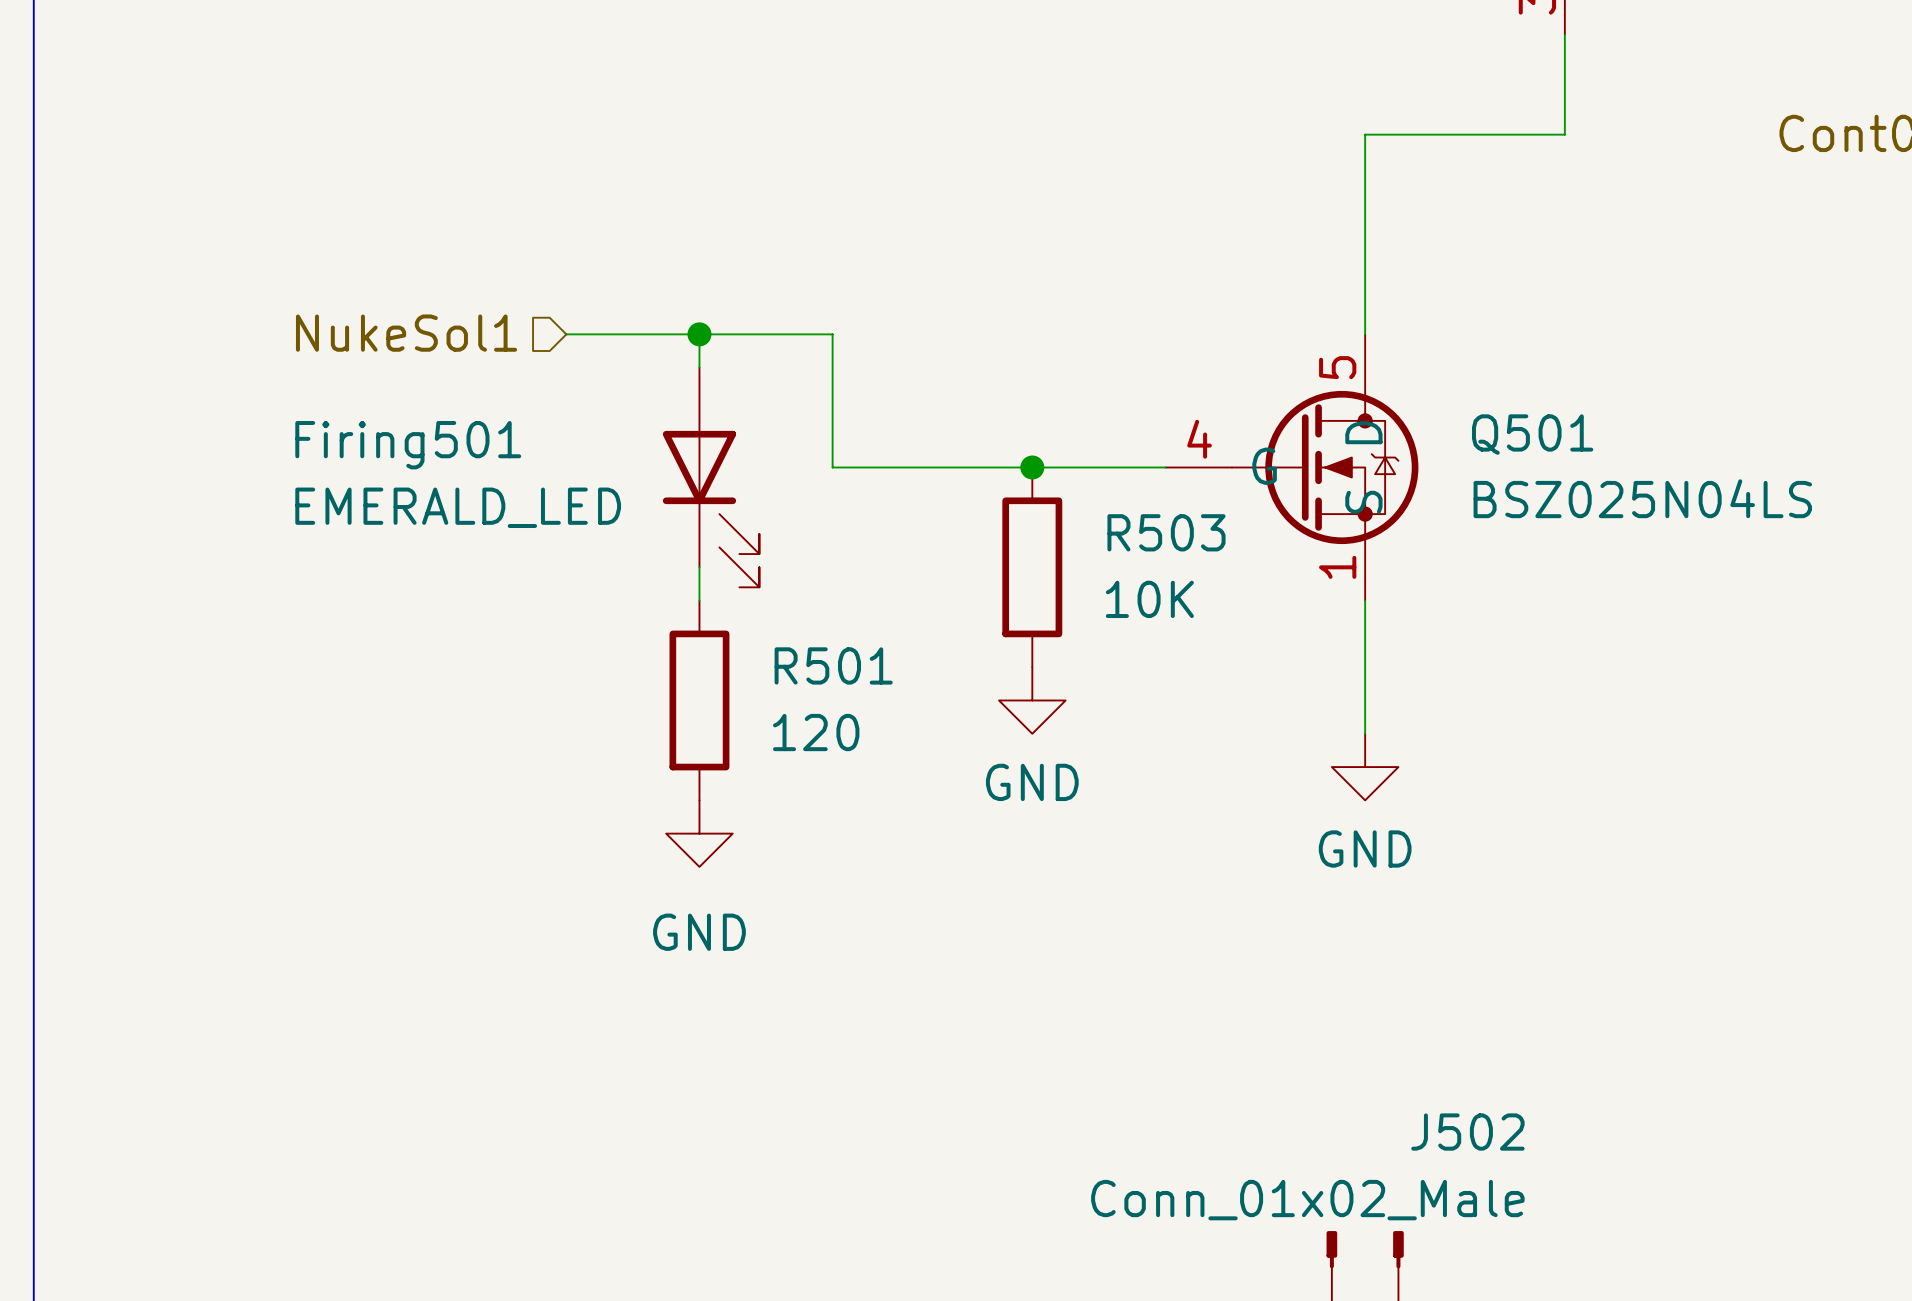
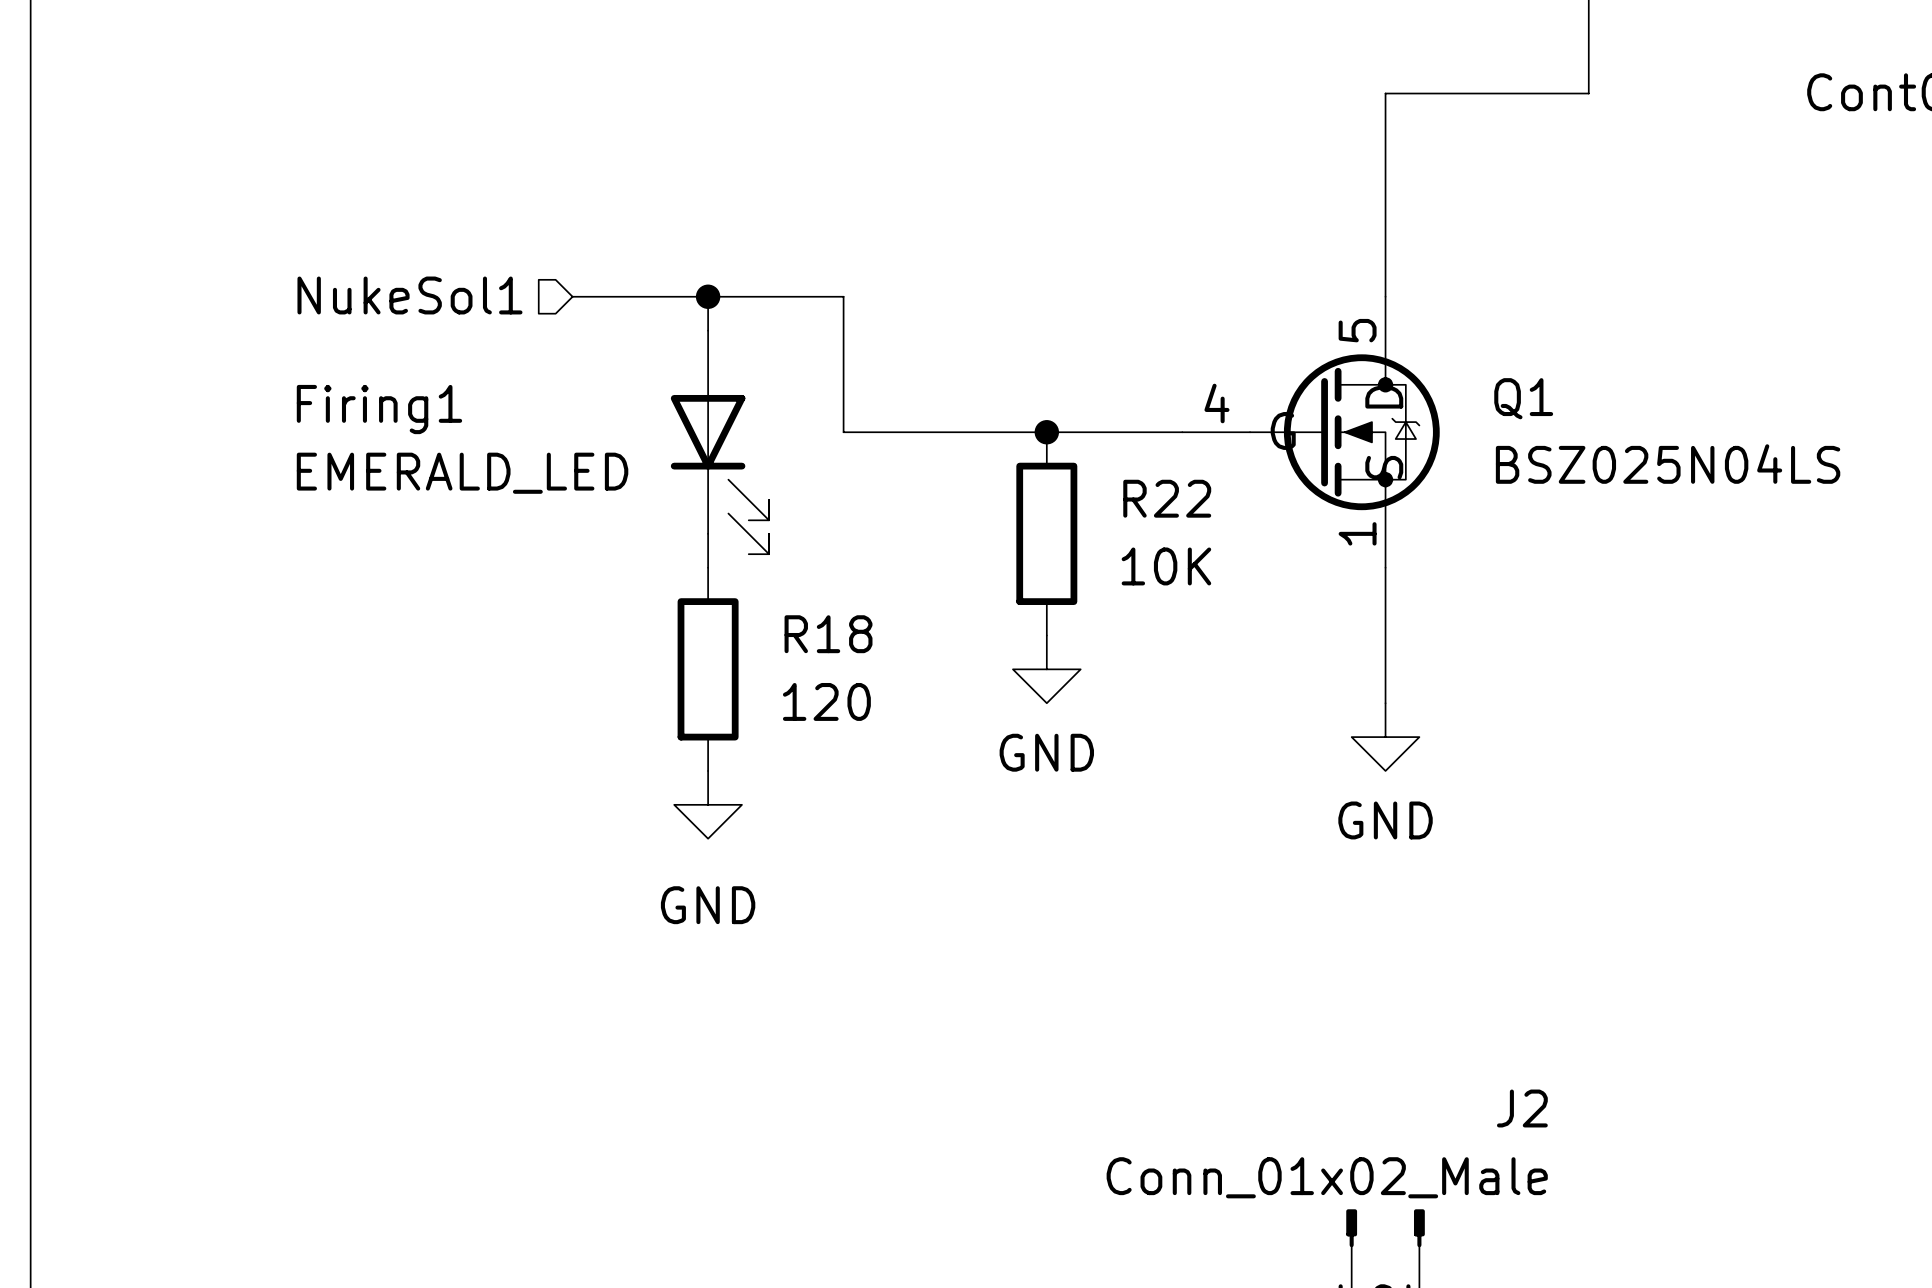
Q501 name: Q501 (1532, 434) -> Q1 (1523, 398)
Firing501 name: Firing501 (408, 445) -> Firing1 (379, 409)
R503 name: R503 (1166, 532) -> R22 (1167, 498)
R501 name: R501 (833, 665) -> R18 (828, 634)
J502 name: J502 (1467, 1132) -> J2 (1522, 1108)

